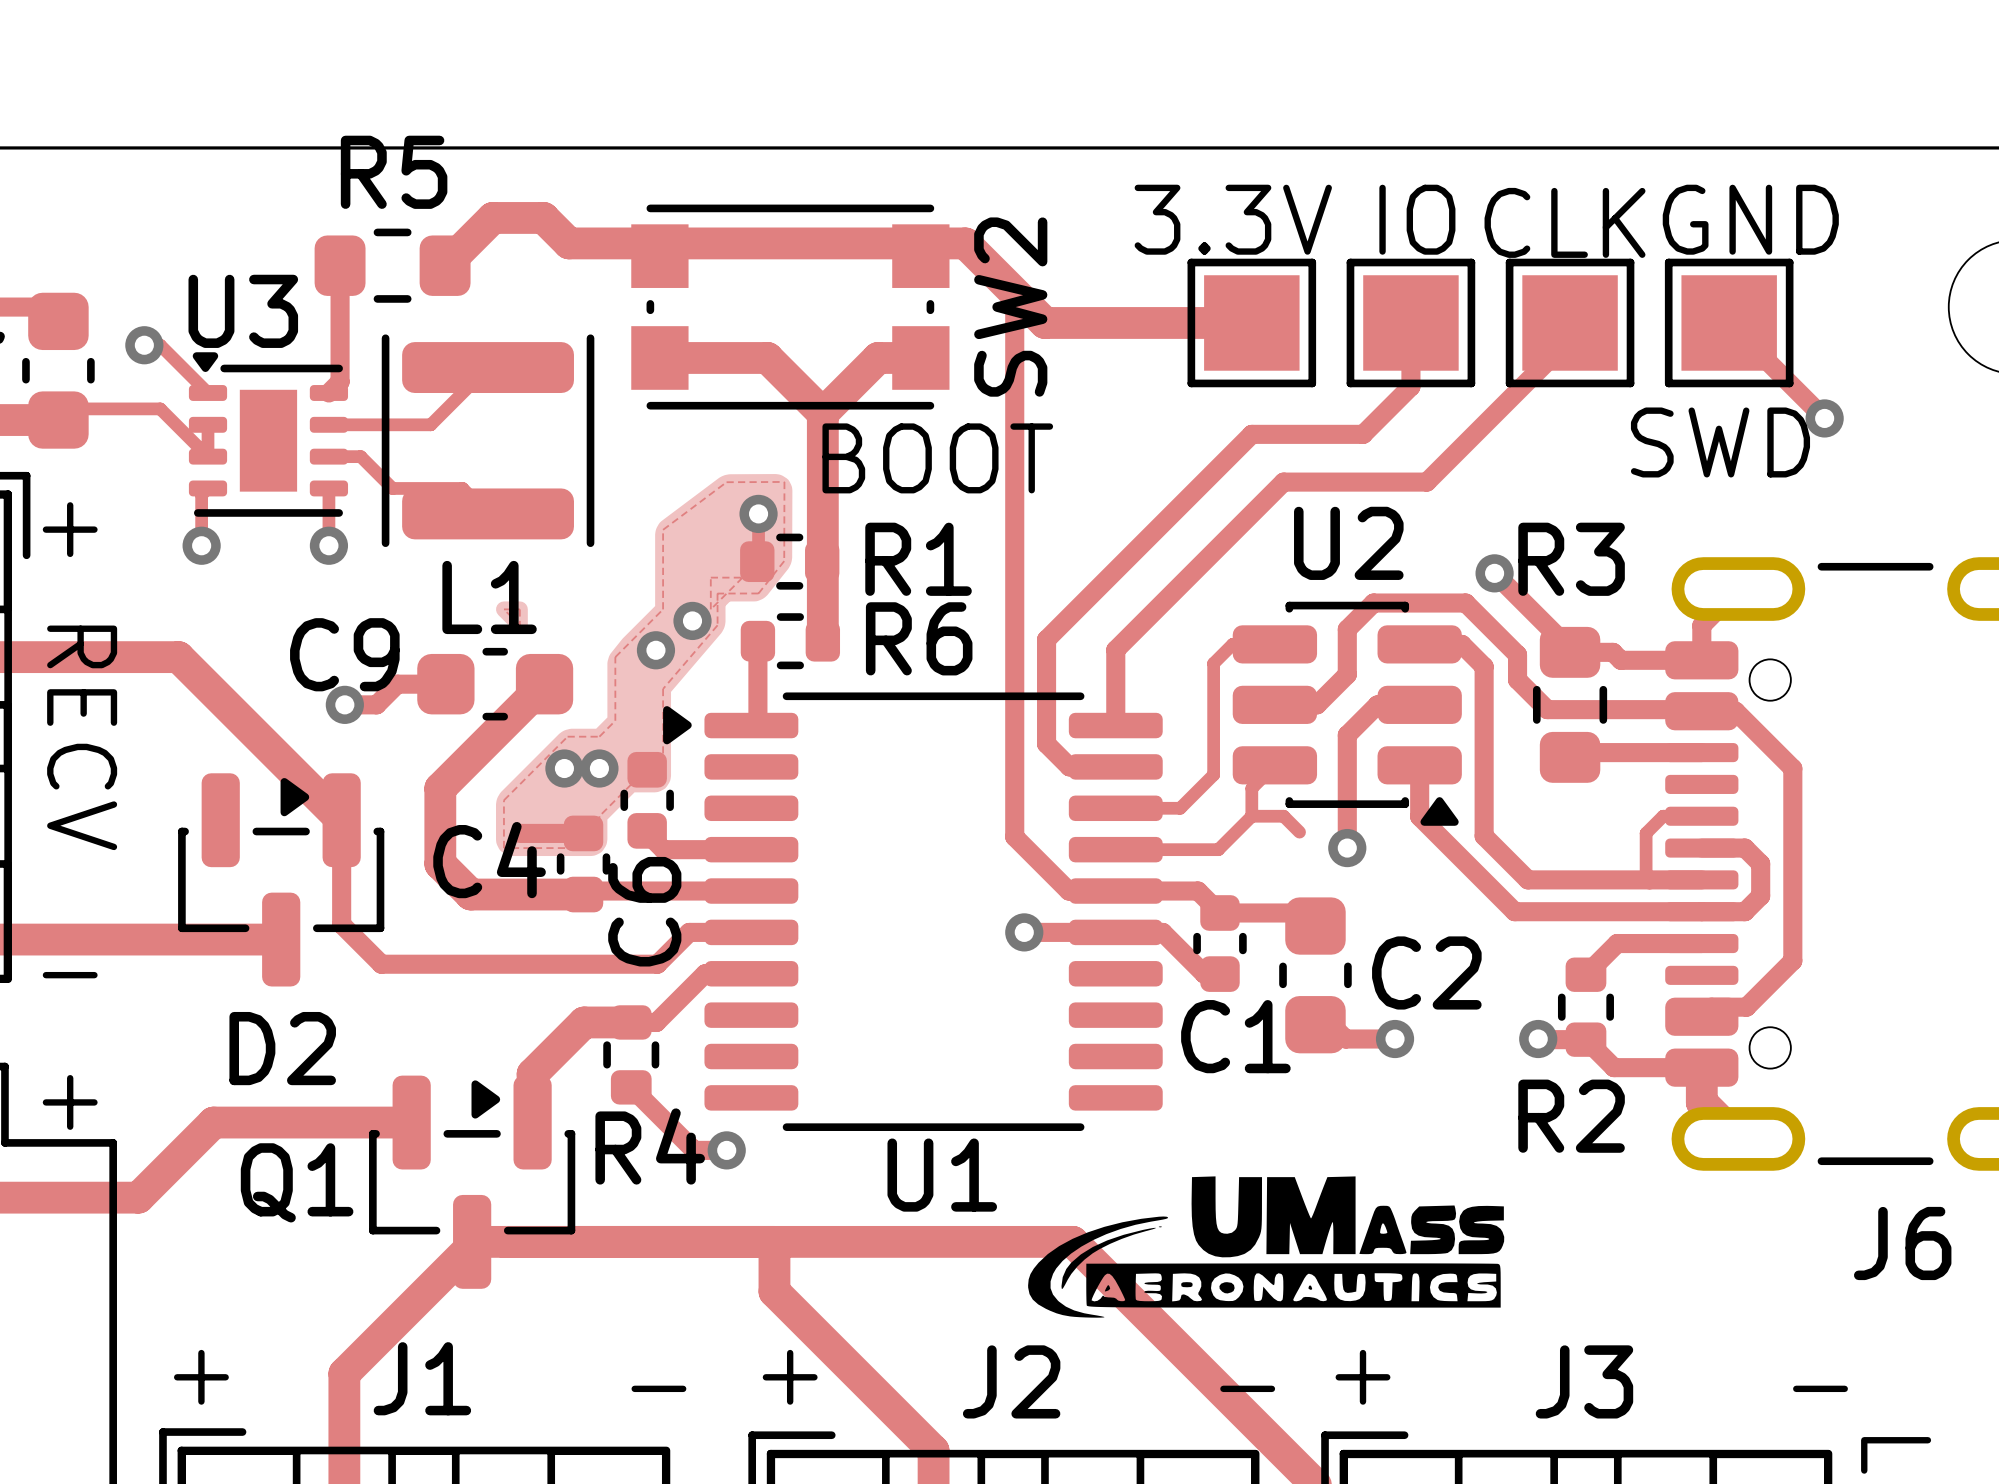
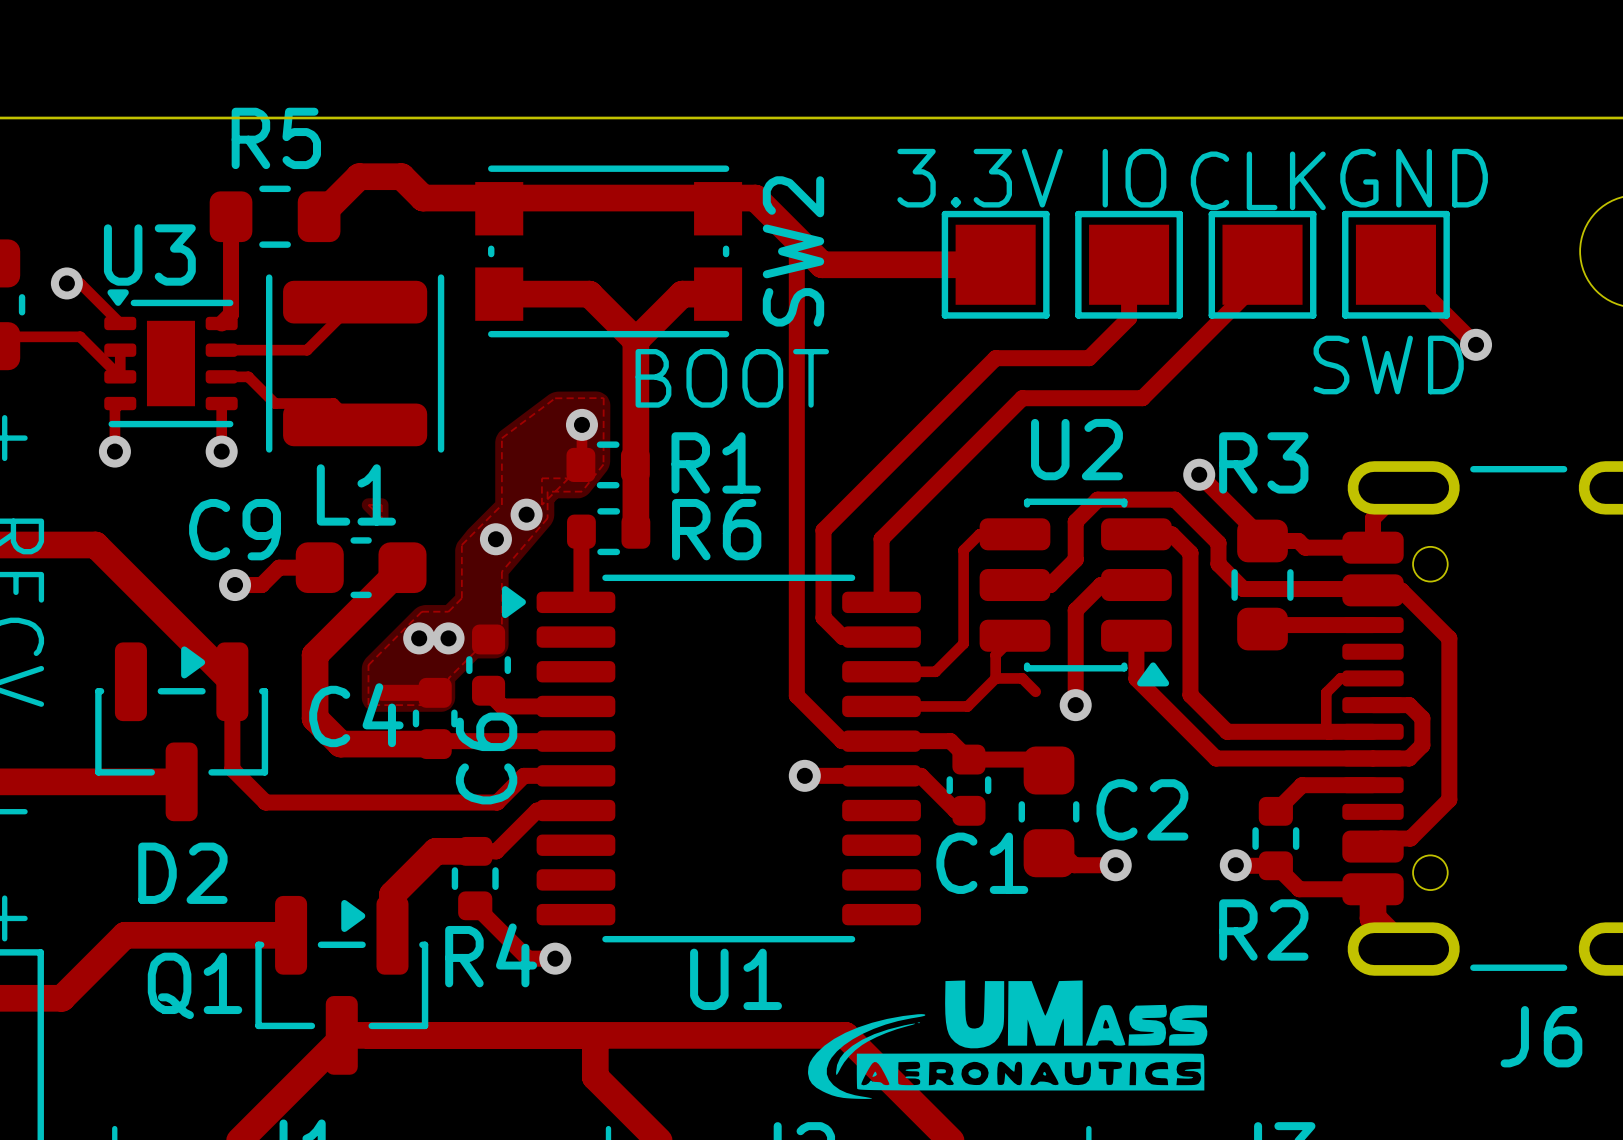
C9 name position: C9 (344, 654) -> C9 (235, 529)

